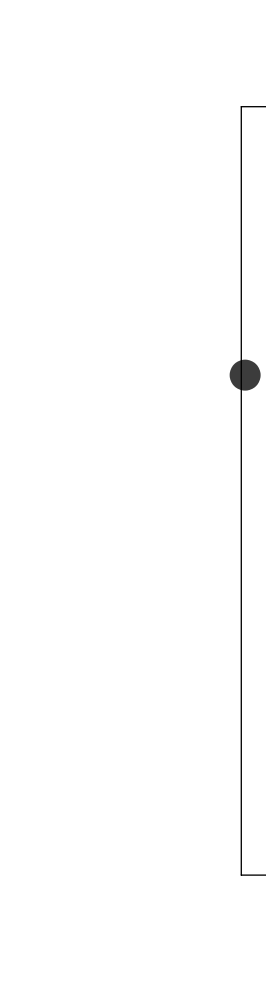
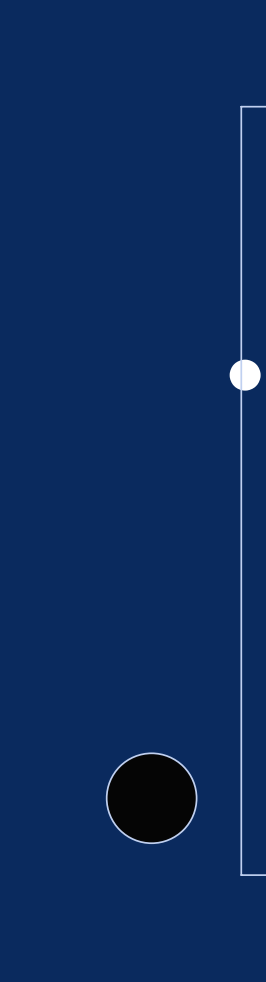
hole: none -> (151, 798)

